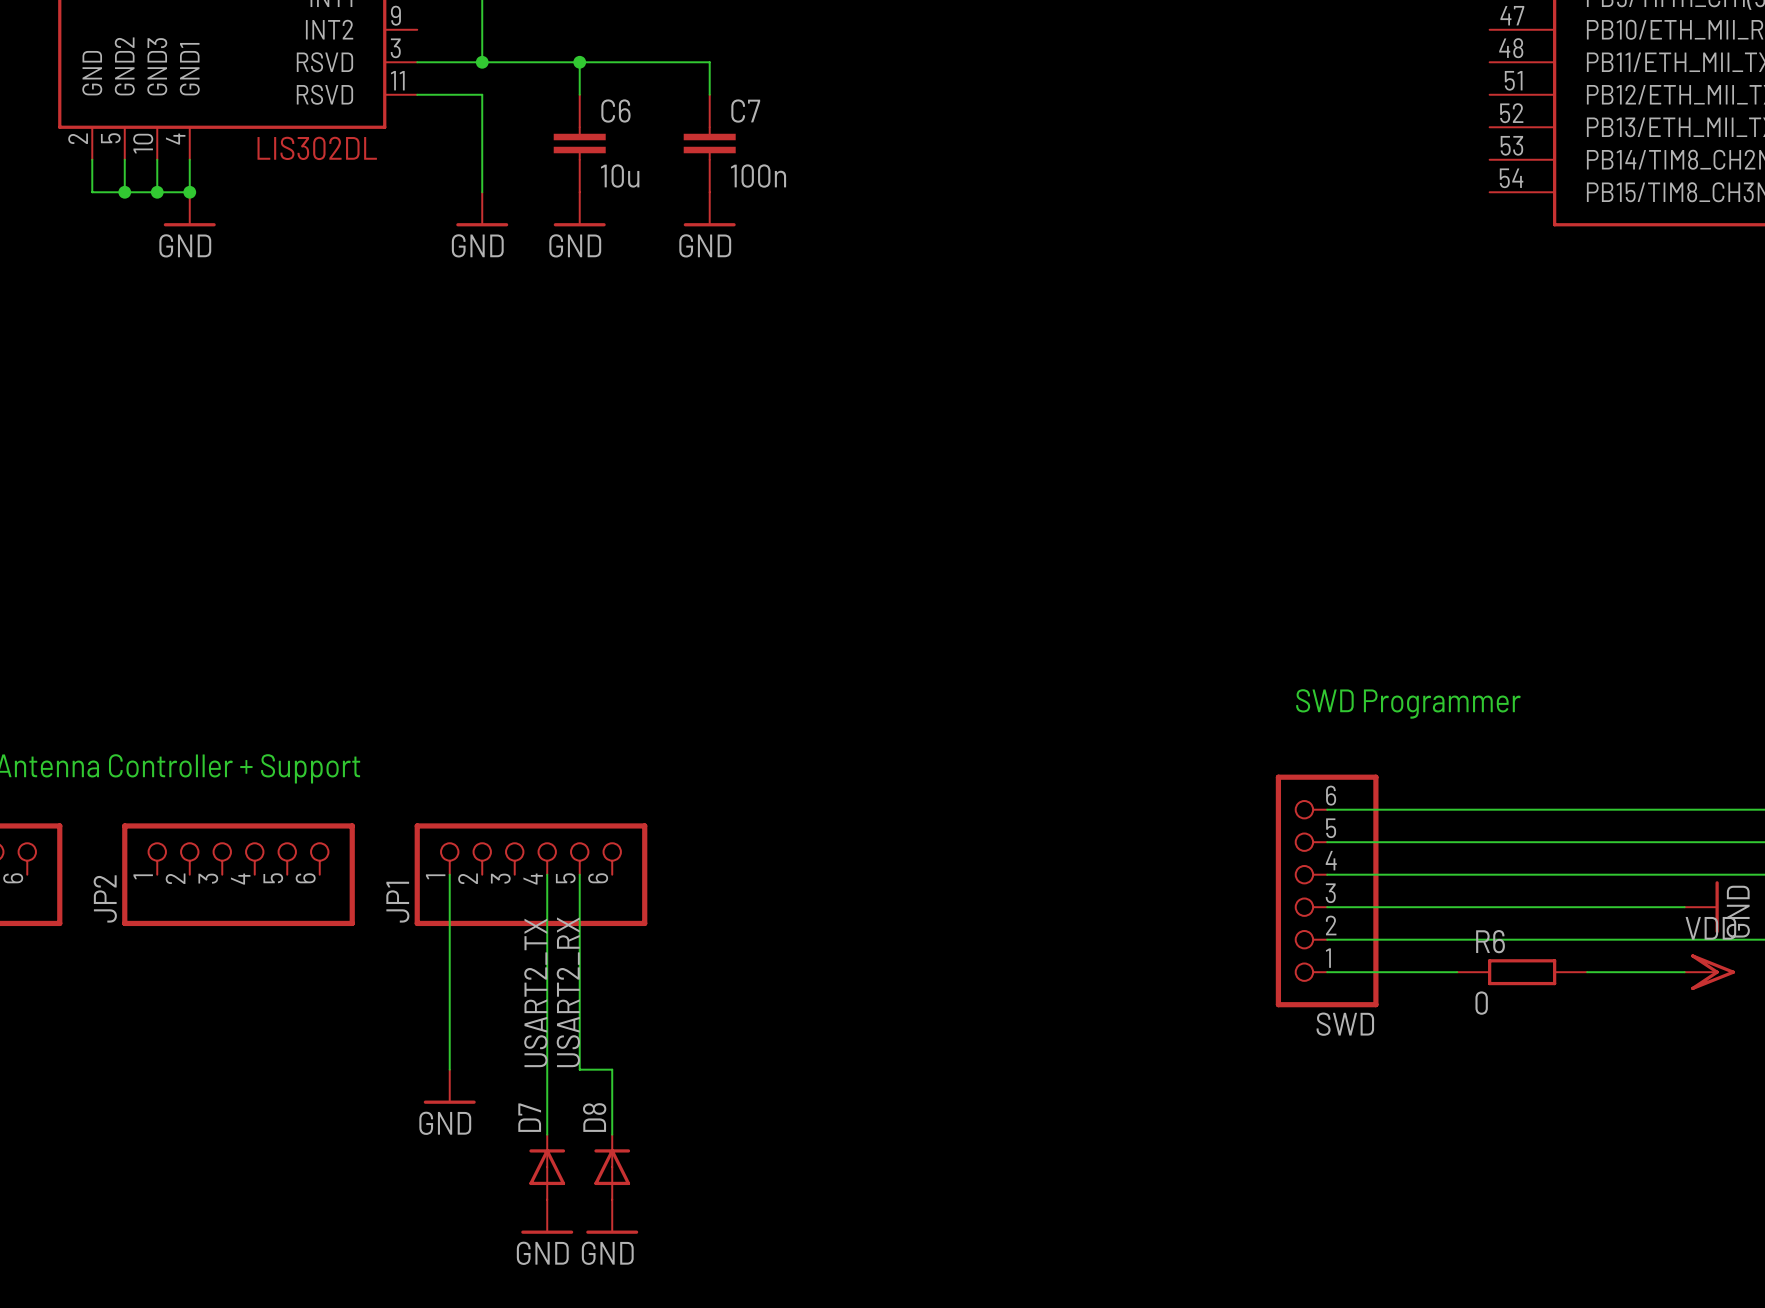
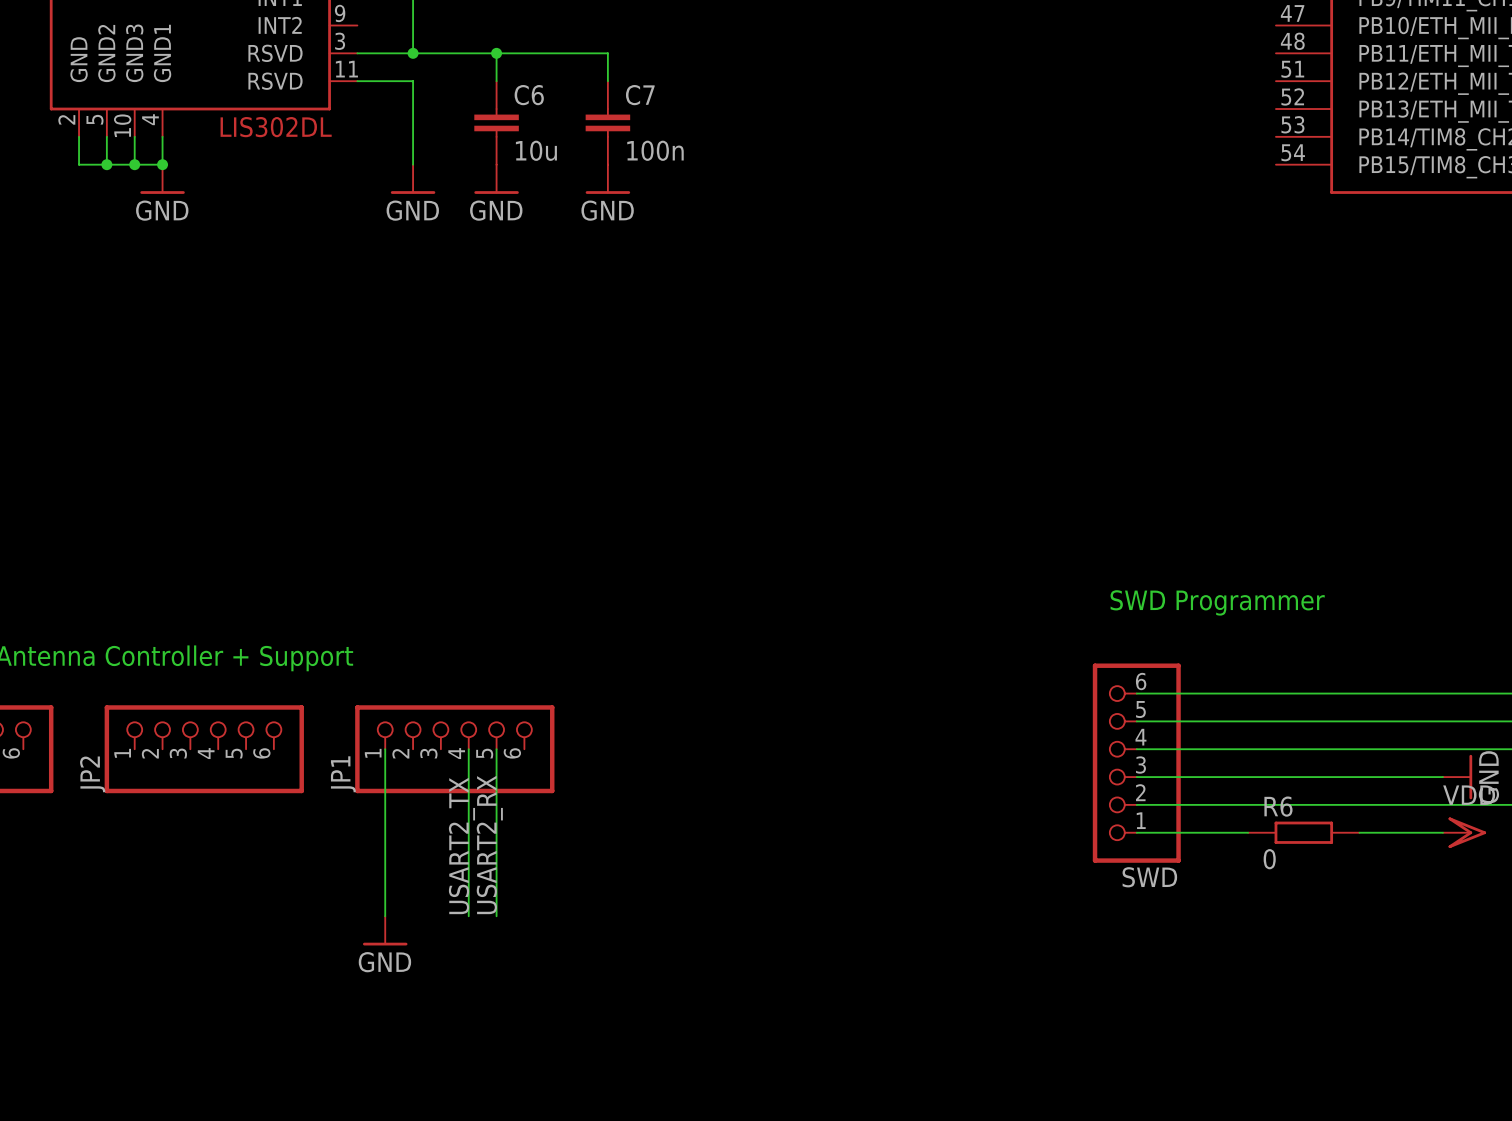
wire: (547, 1069) (547, 1134) -> none
wire: (579, 1069) (612, 1069) (612, 1134) -> none
D7: (547, 1167) -> none
D8: (612, 1167) -> none
power symbol: GND (547, 1216) -> none
power symbol: GND (612, 1216) -> none

